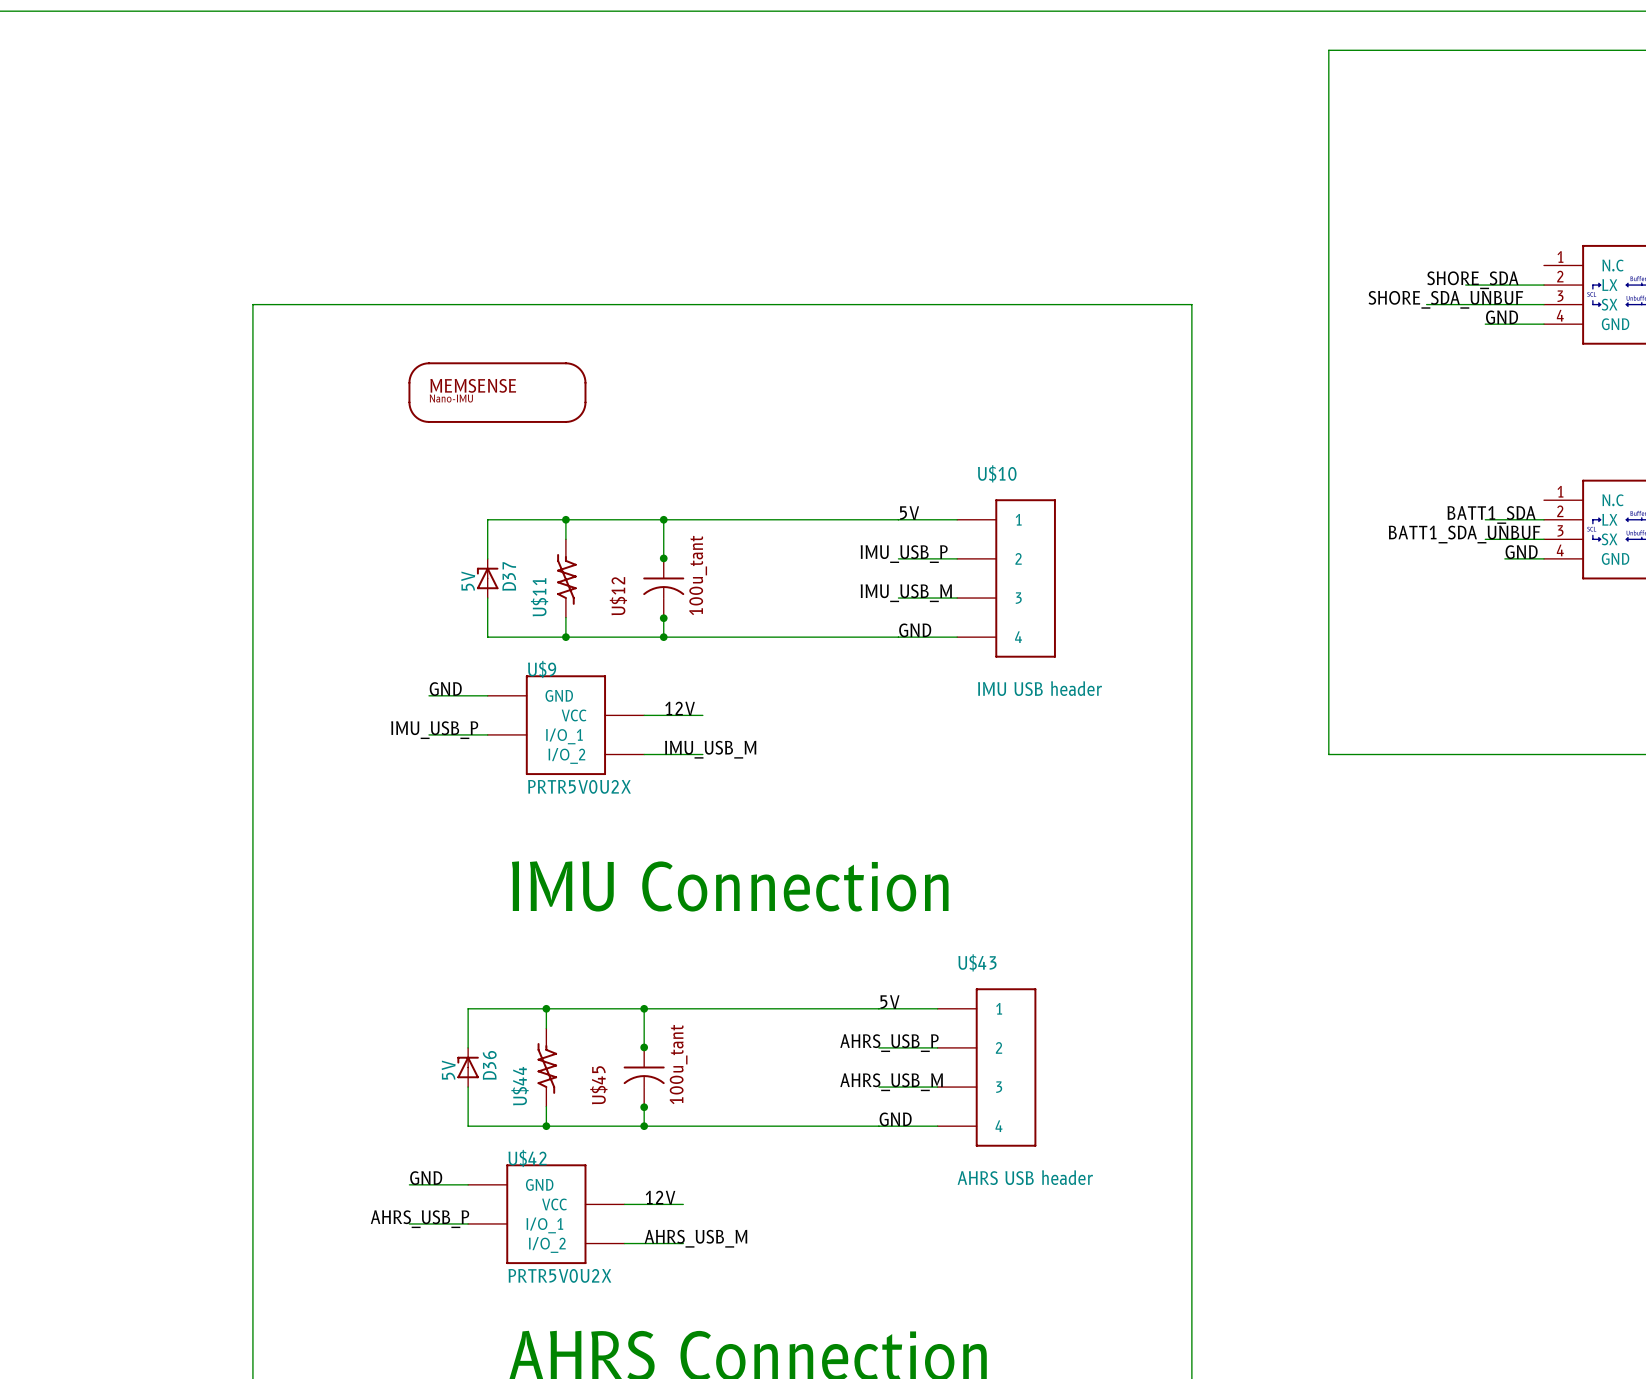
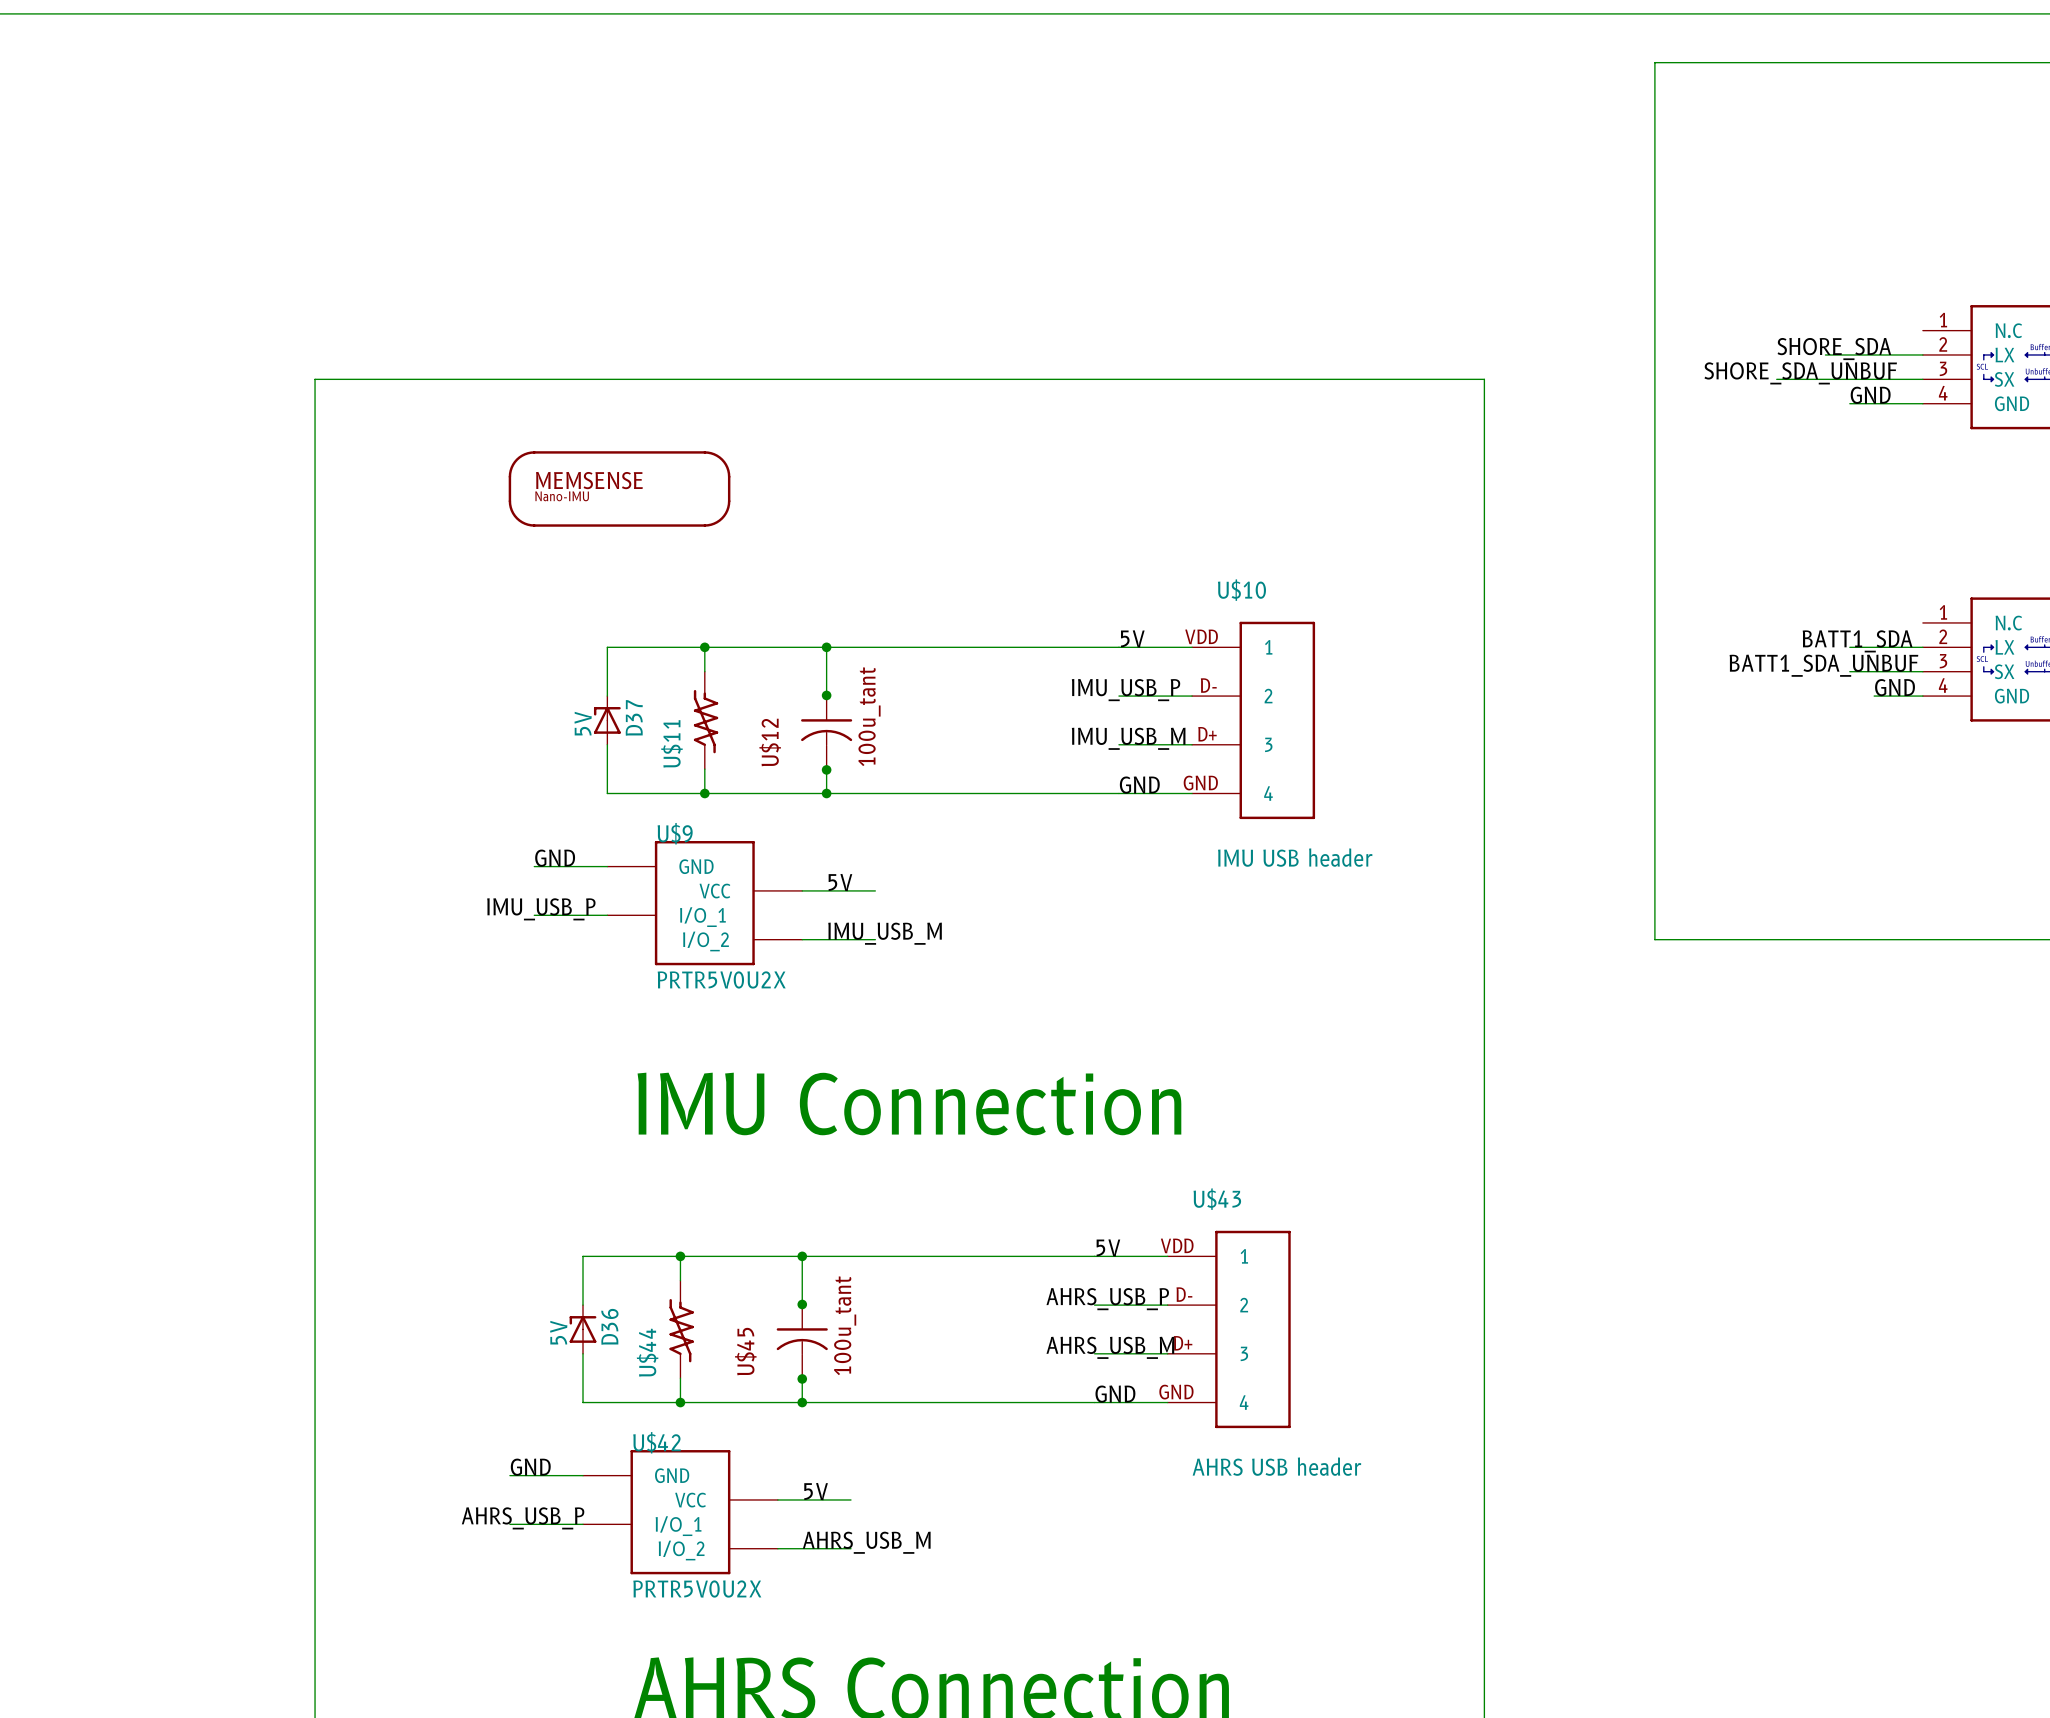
U$10 pin number: none -> VDD (1201, 636)
U$10 pin number: none -> D- (1208, 685)
U$10 pin number: none -> D+ (1207, 734)
U$10 pin number: none -> GND (1200, 783)
label: 12V (680, 708) -> 5V (840, 882)
U$43 pin number: none -> VDD (1177, 1245)
U$43 pin number: none -> D- (1184, 1294)
U$43 pin number: none -> D+ (1183, 1343)
U$43 pin number: none -> GND (1176, 1392)
label: 12V (660, 1197) -> 5V (816, 1491)

